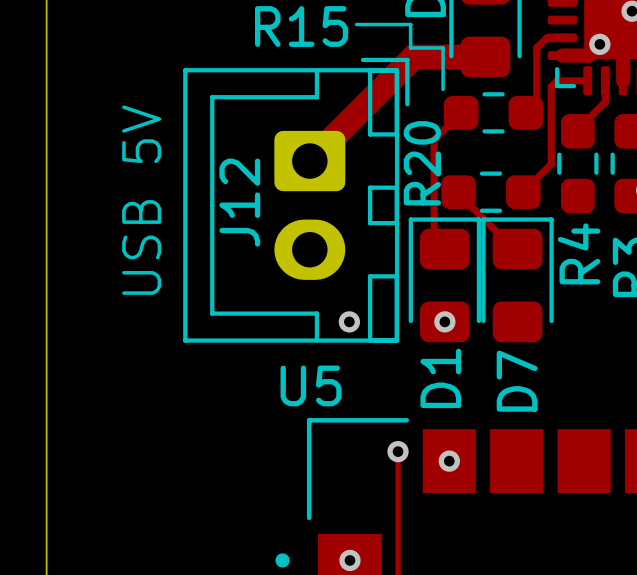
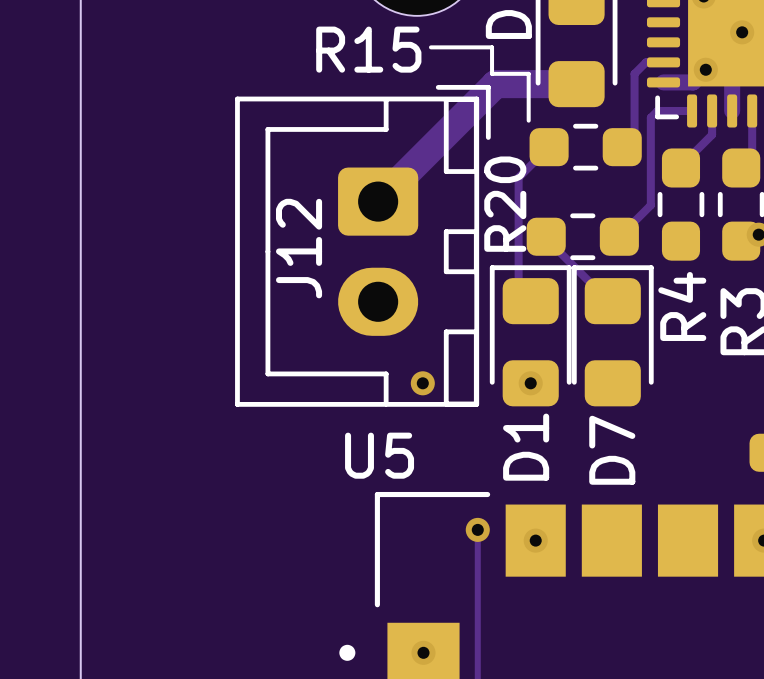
text: USB 5V (141, 200) -> none

